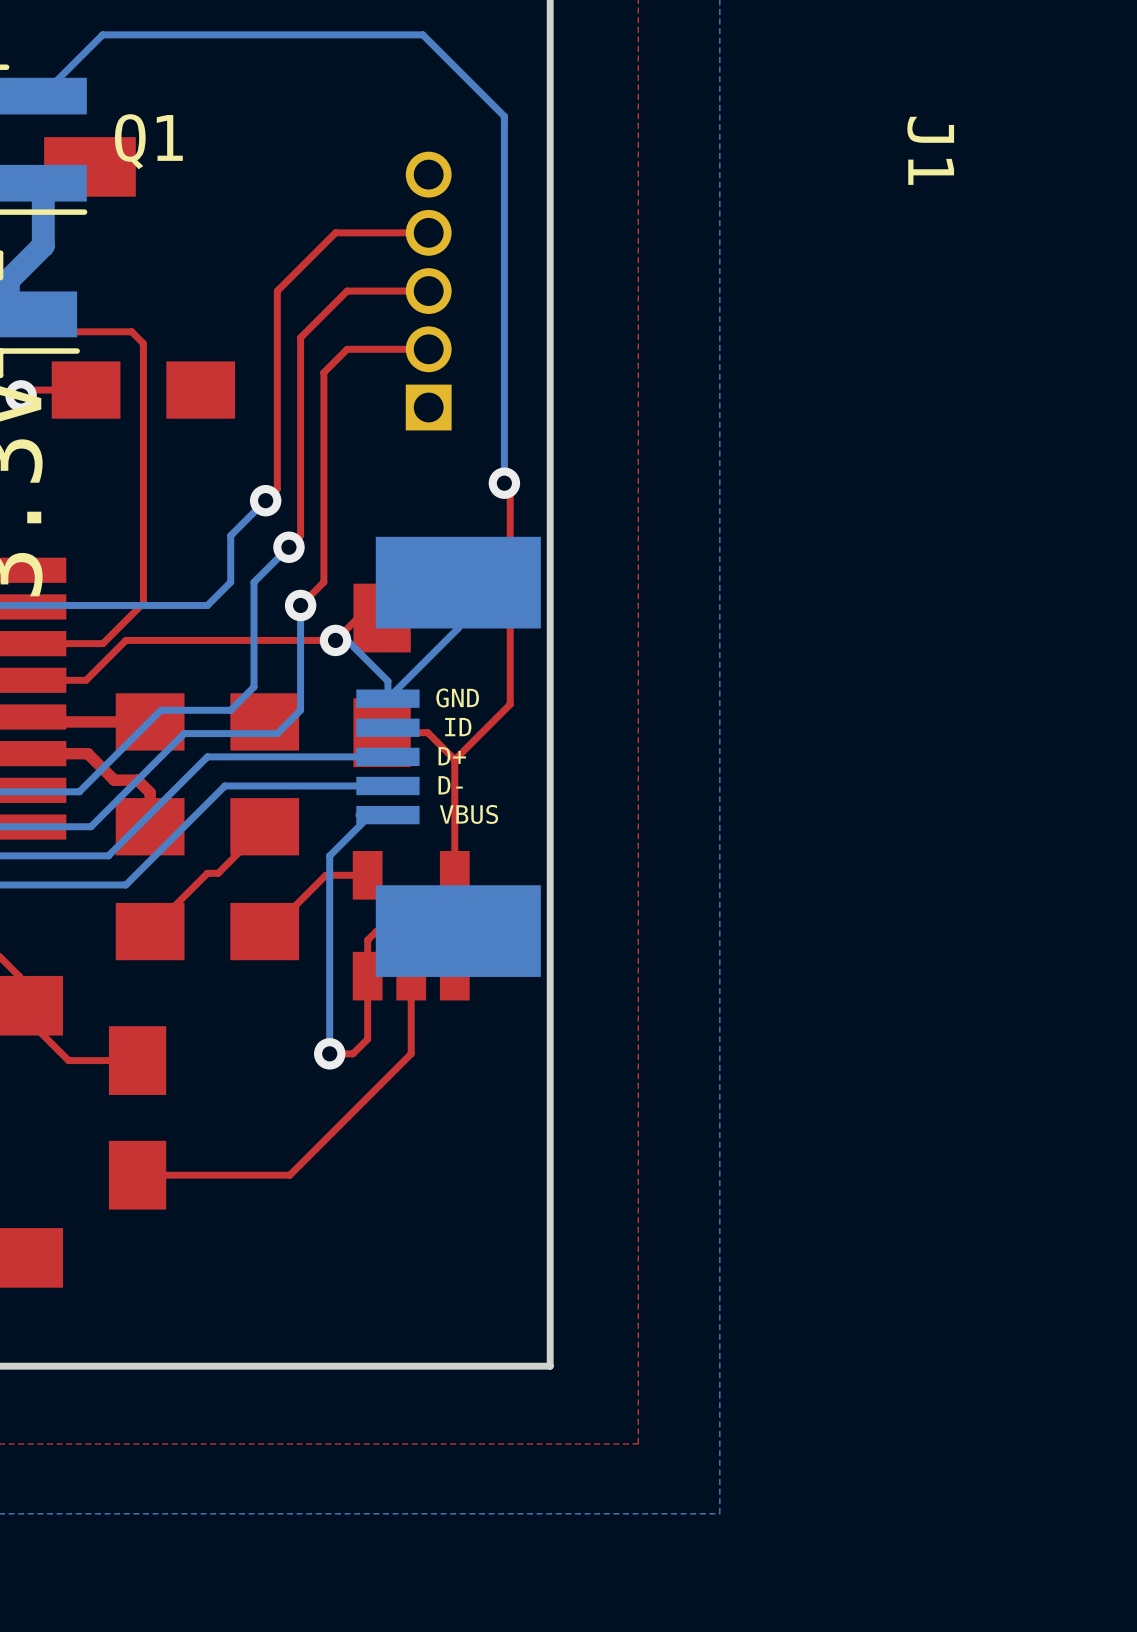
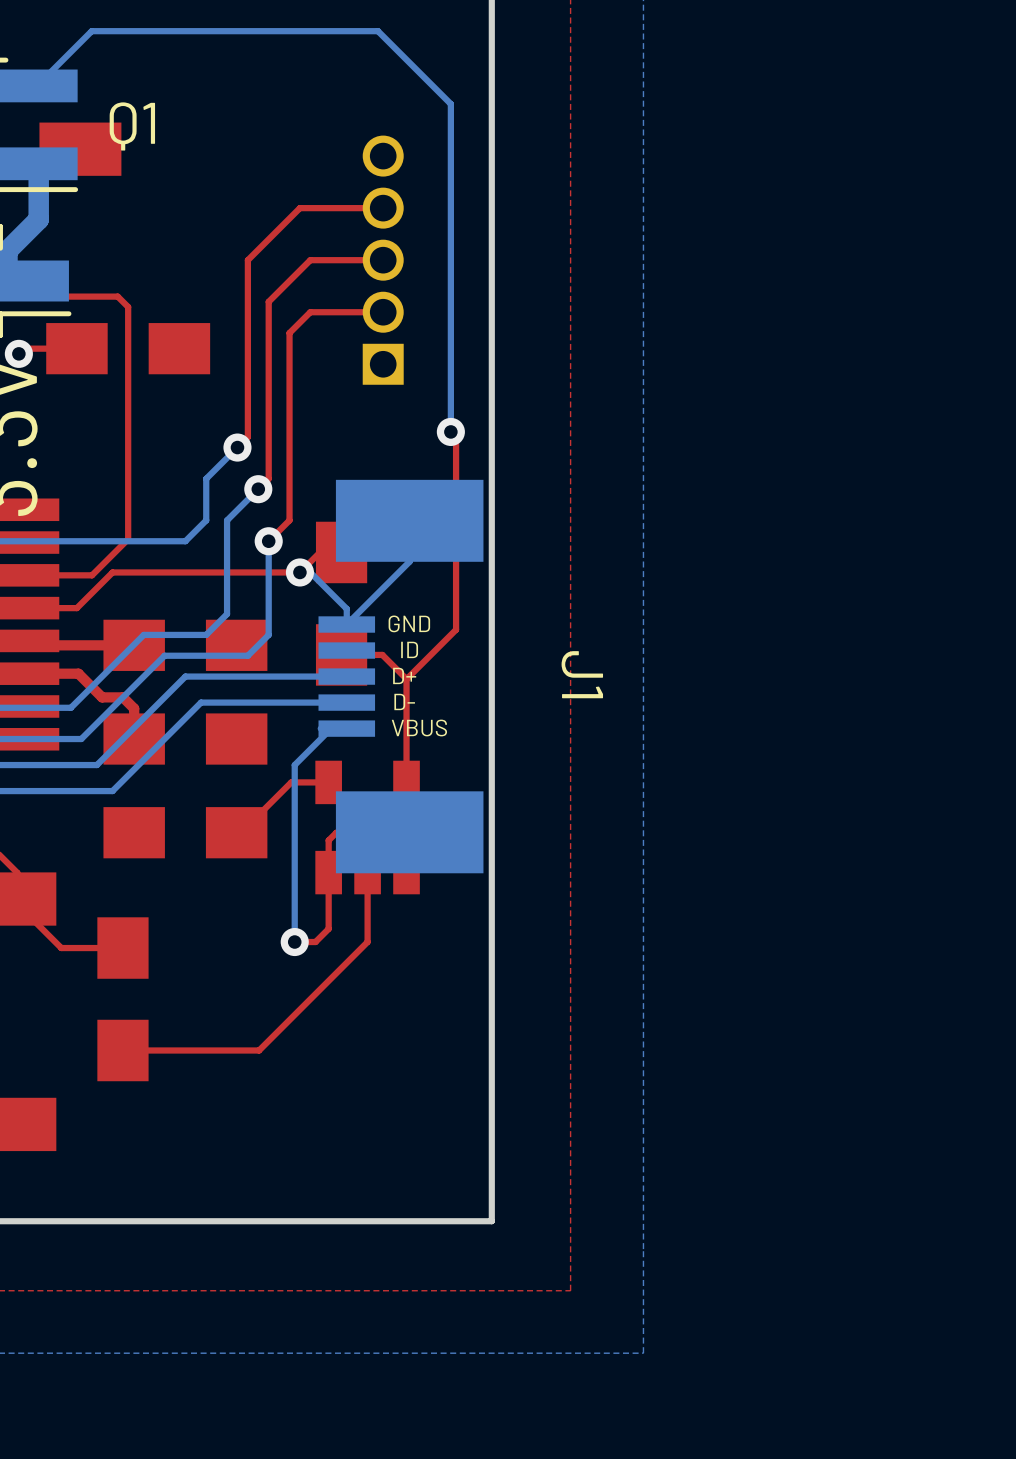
J1 name position: J1 (930, 150) -> J1 (582, 674)
top track: (264, 826) (218, 873) (207, 873) (150, 930) -> none

